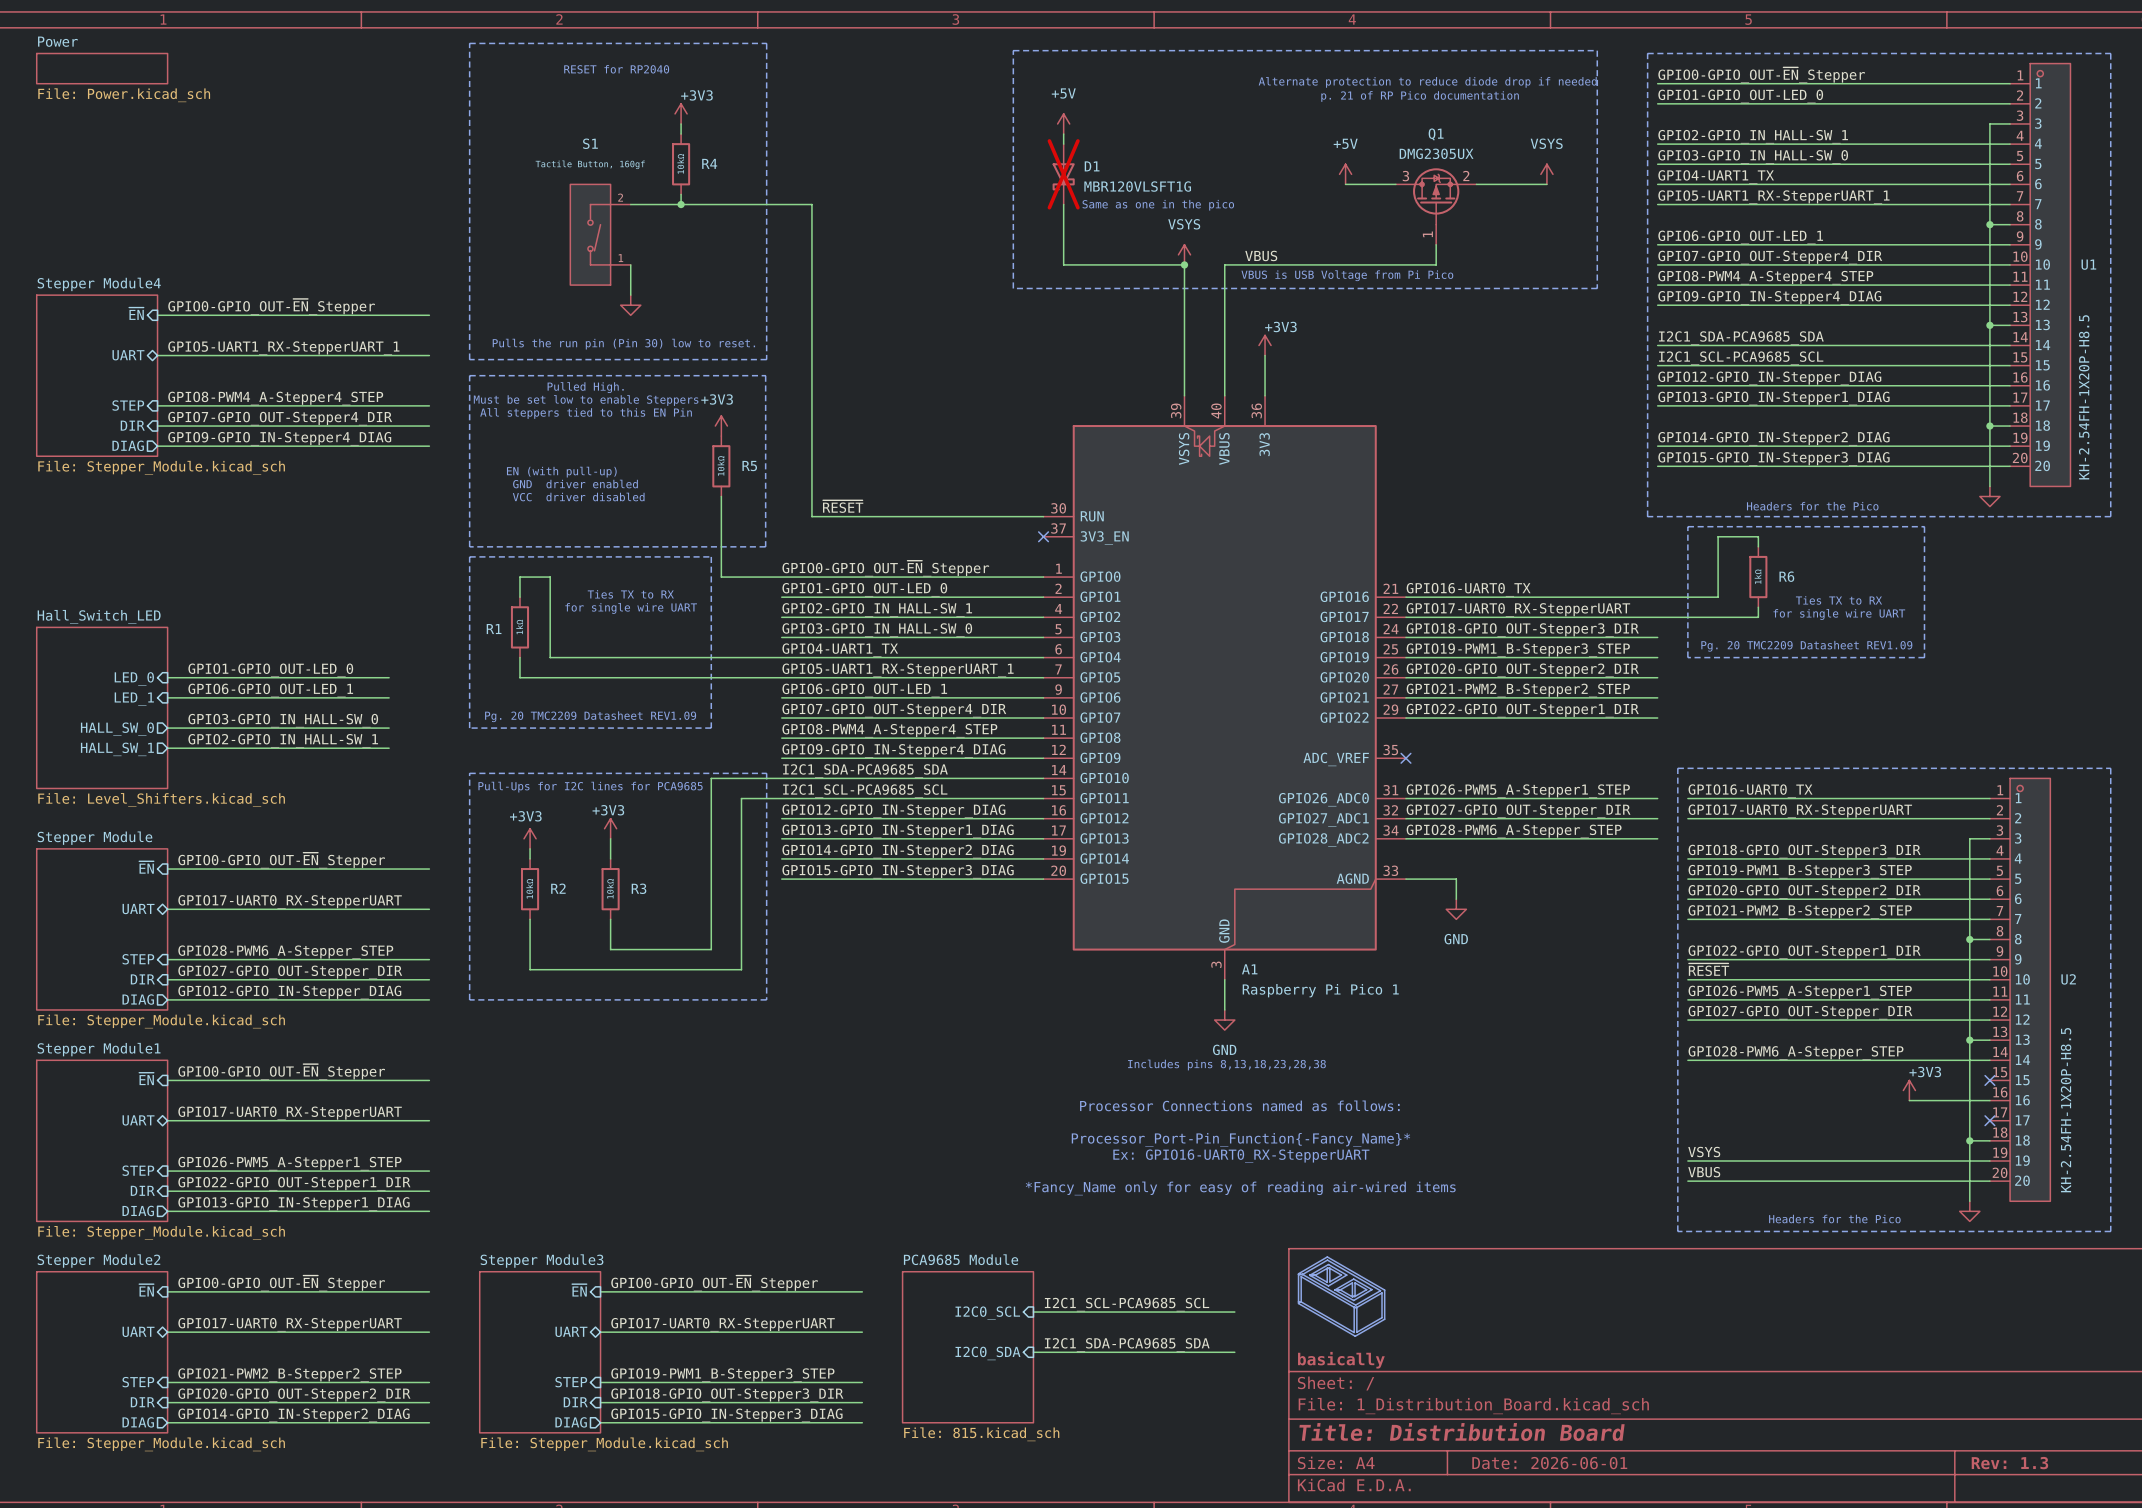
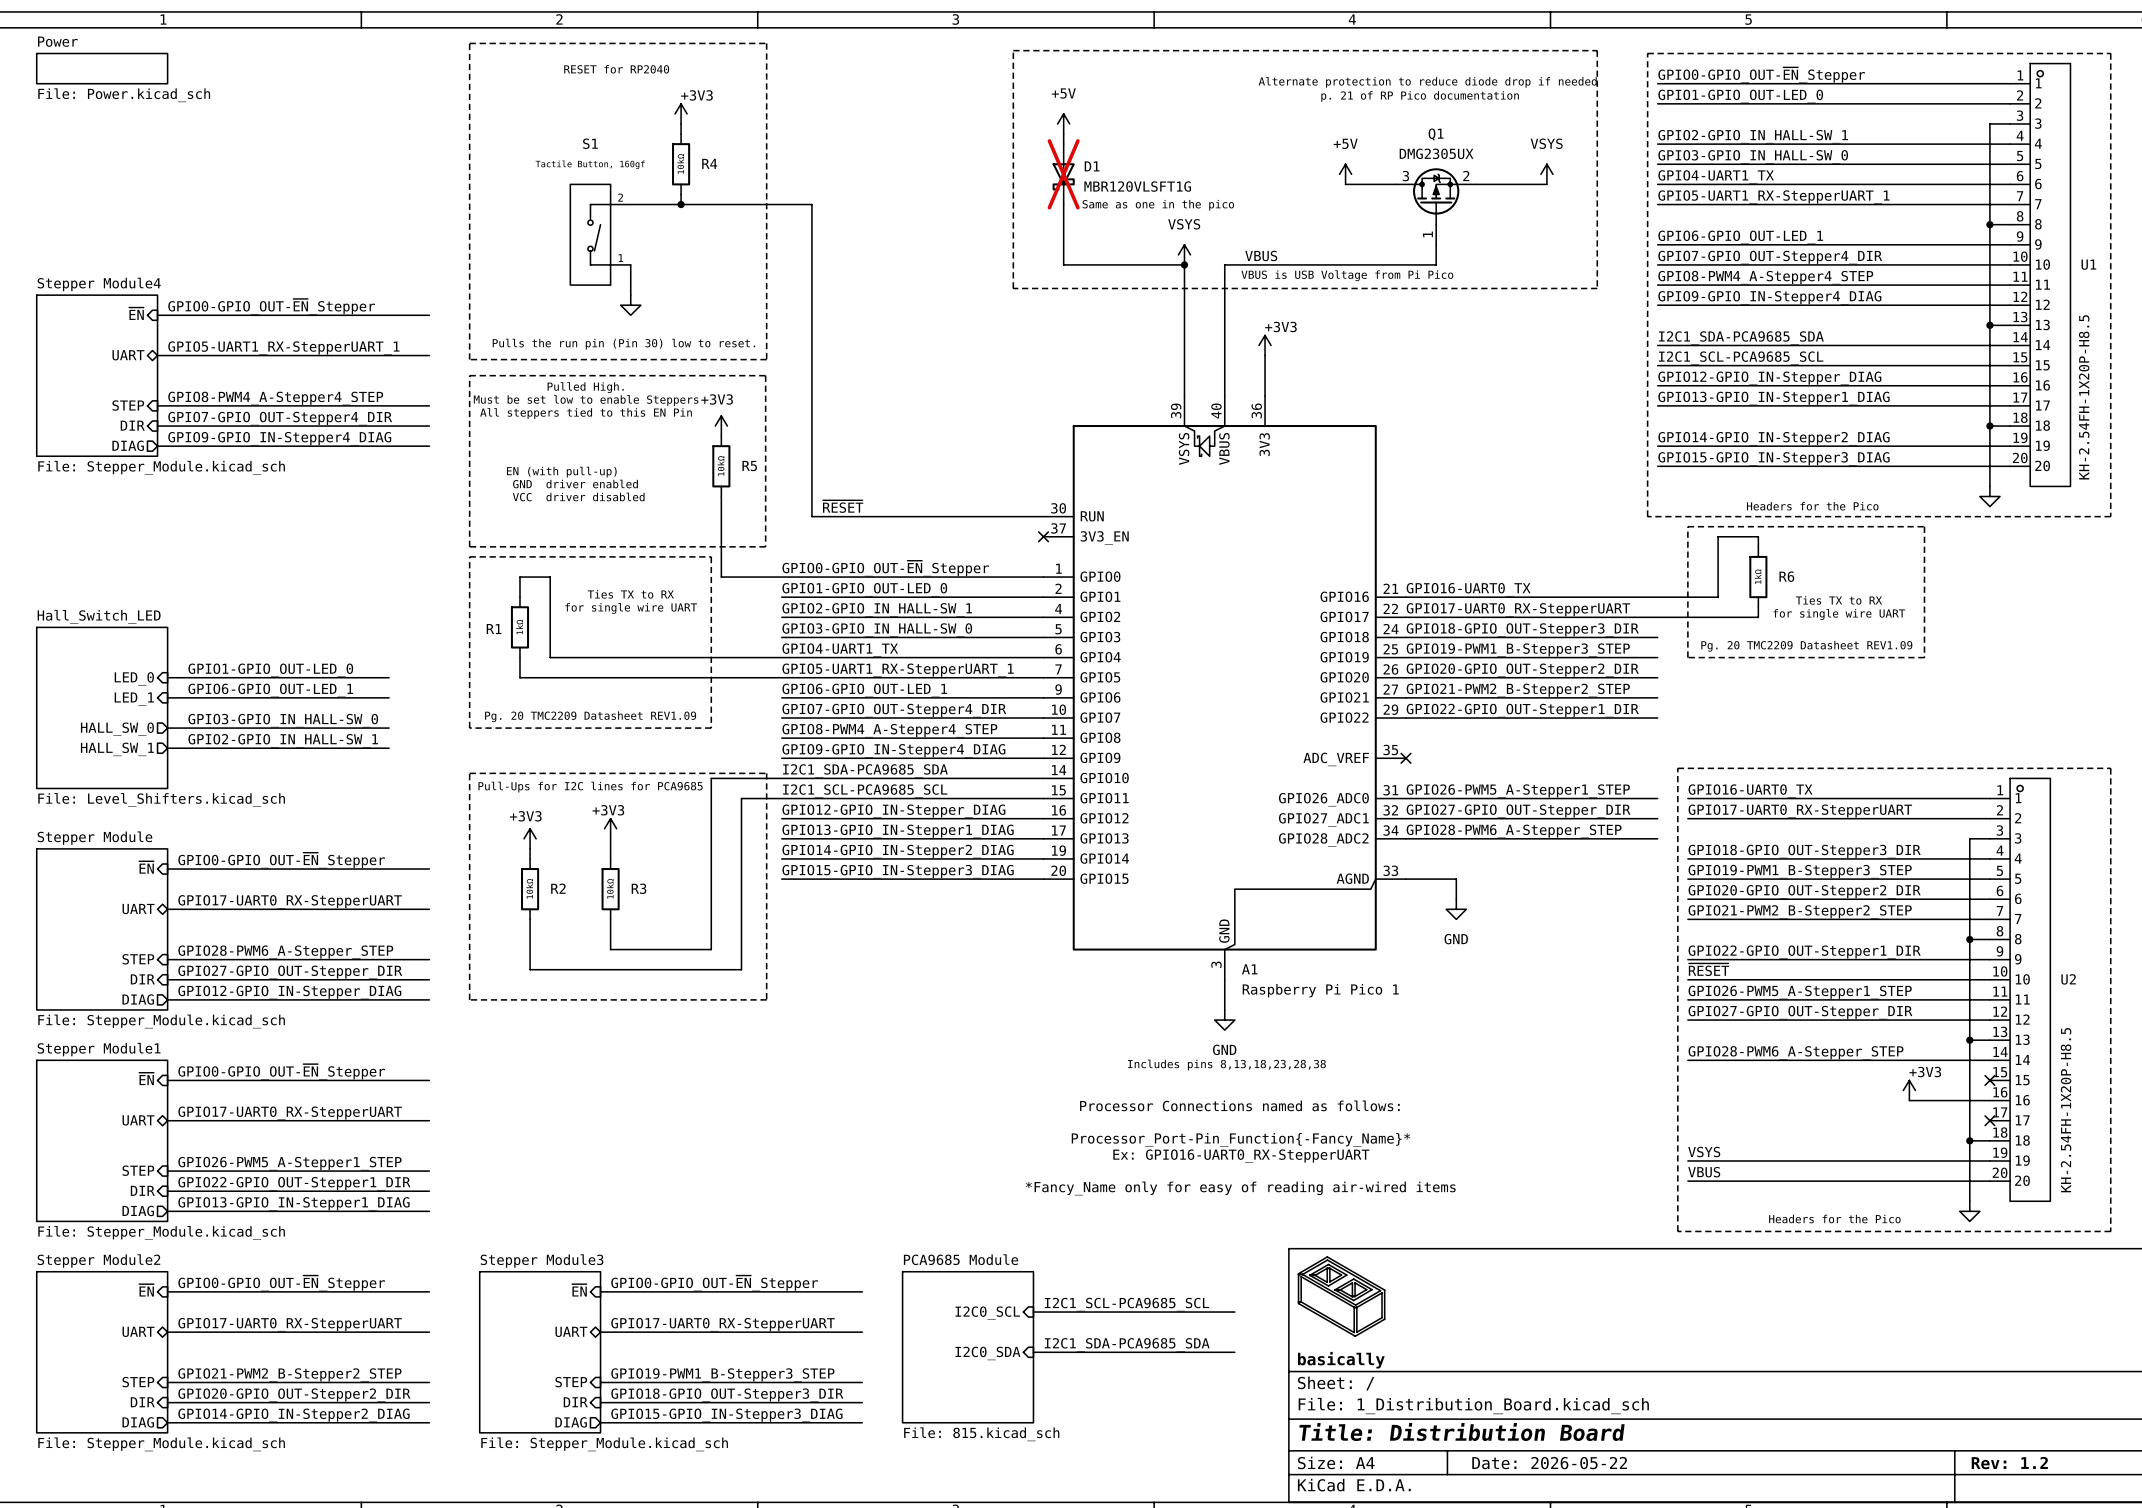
title block: Date: 2026-06-01 (1549, 1463) -> Date: 2026-05-22 (1549, 1463)
title block: Rev: 1.3 (2009, 1463) -> Rev: 1.2 (2009, 1463)

